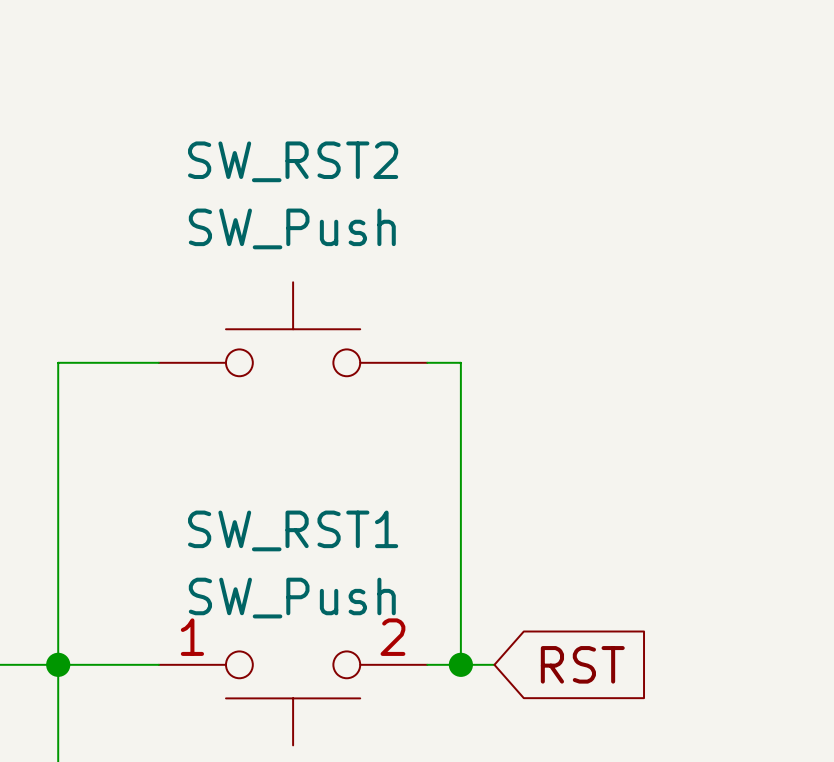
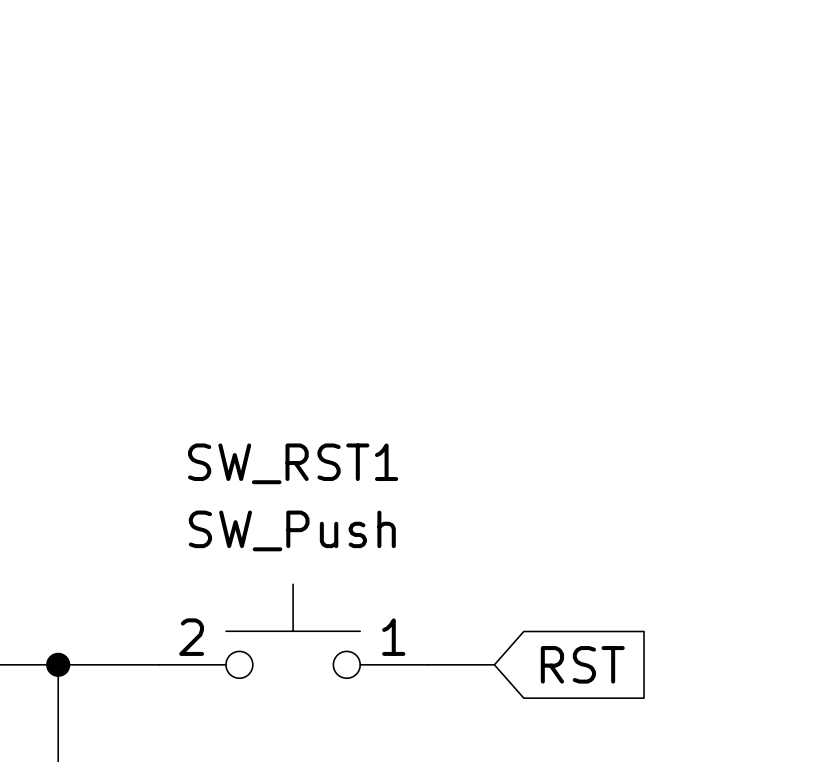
SW_RST2: SW_Push (293, 329) -> none
wire: (158, 362) (58, 362) (58, 664) -> none
wire: (427, 362) (460, 362) (460, 664) -> none
junction: (460, 664) -> none
SW_RST1 rotation: 0° (293, 698) -> 180° (293, 631)

